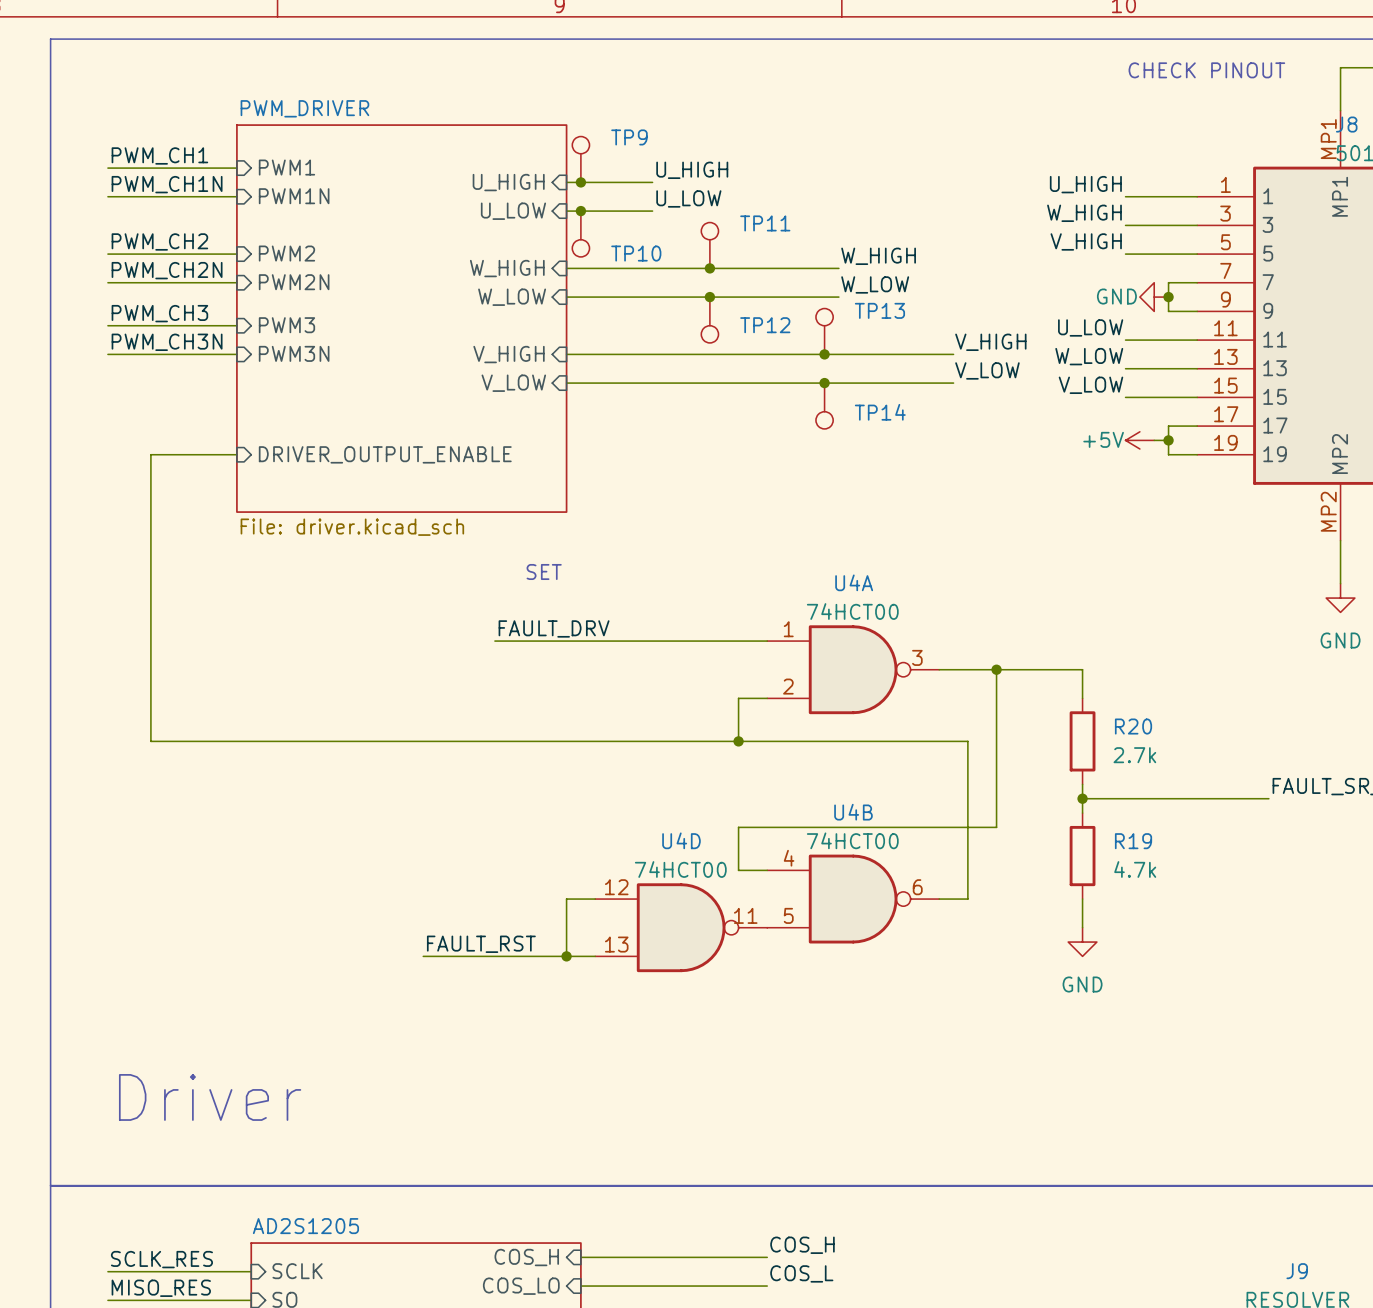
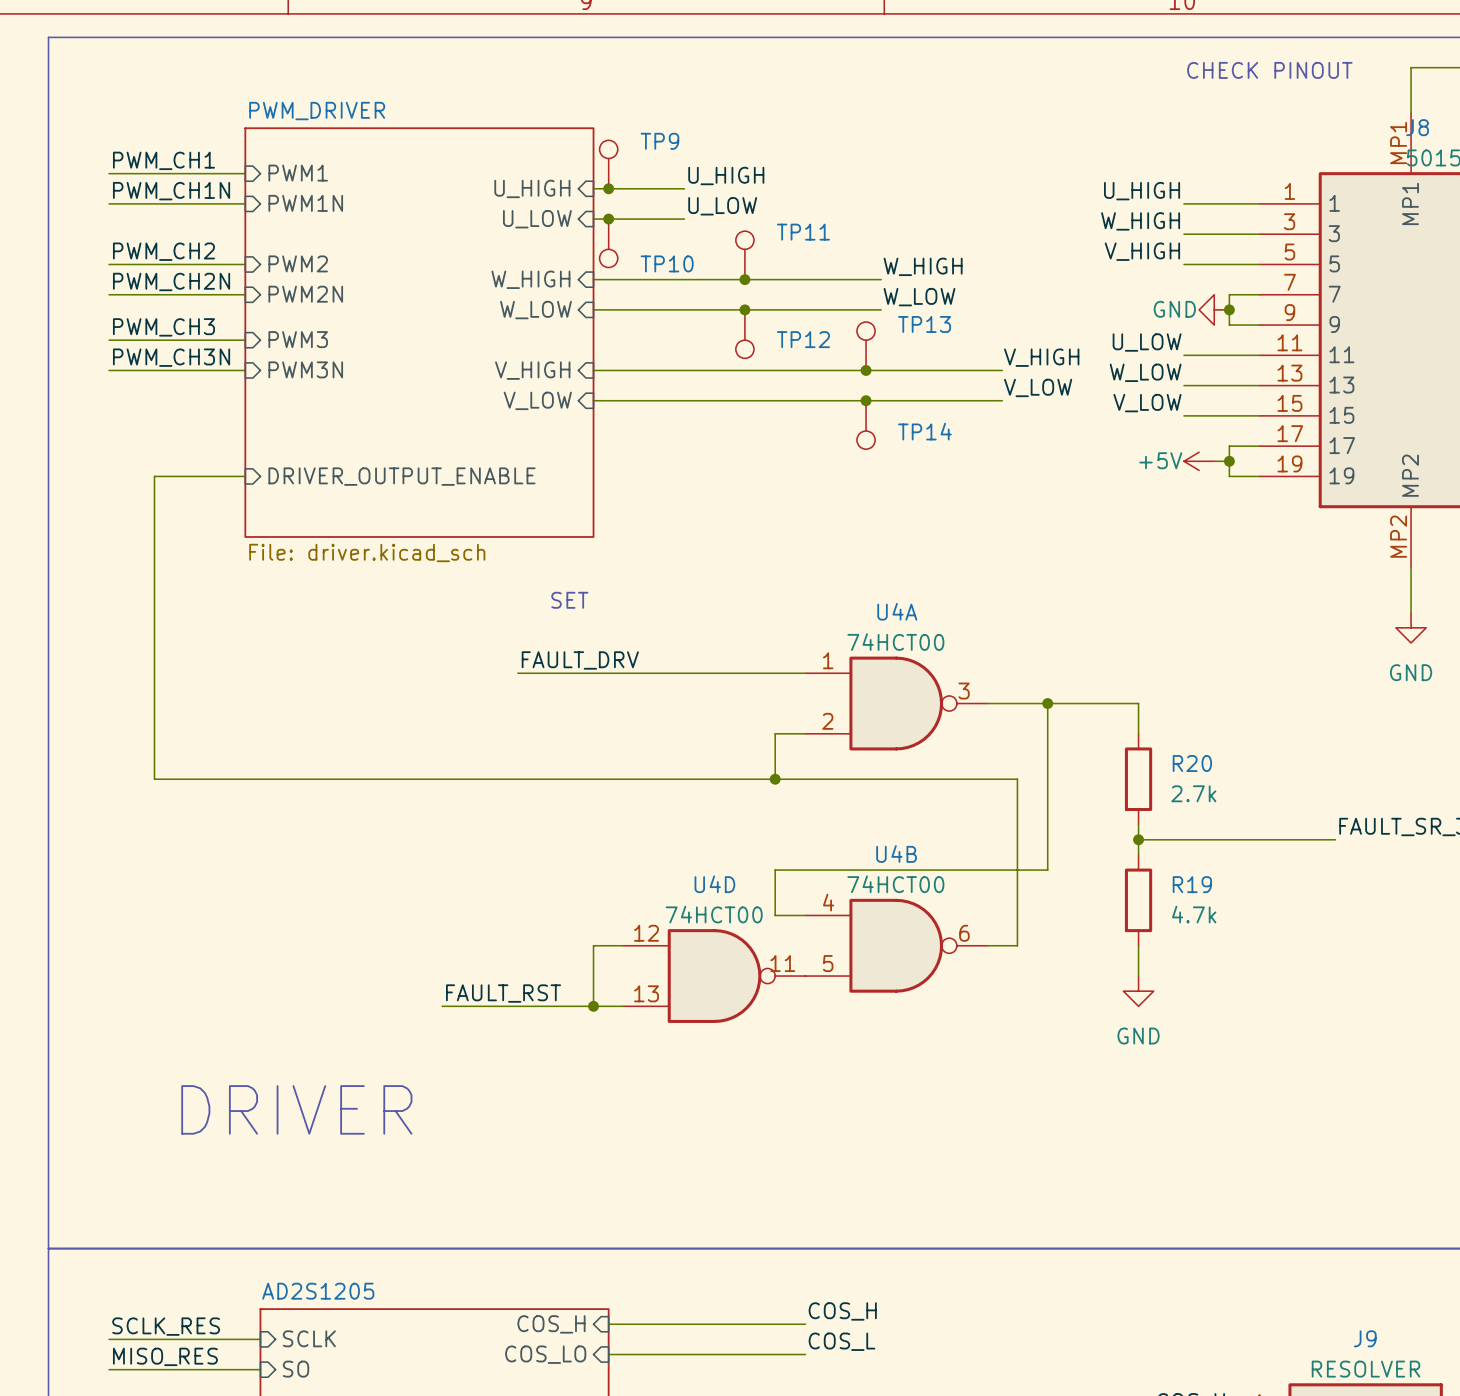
text: none -> DRIVER (296, 1109)
text: Driver (210, 1097) -> none

